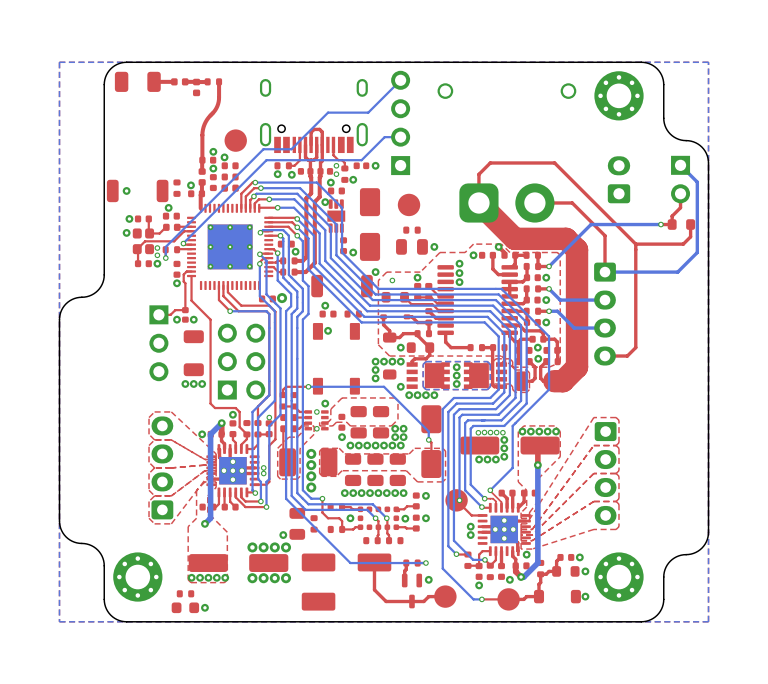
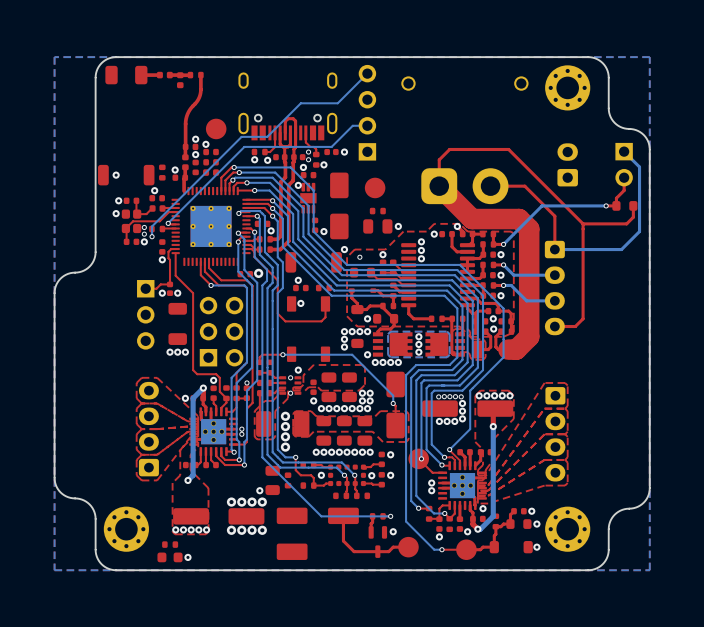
top track: none -> (246, 249) (251, 249) (254, 251) (254, 256) (277, 280) (277, 313) (285, 321) (321, 321) (325, 317) (325, 303)

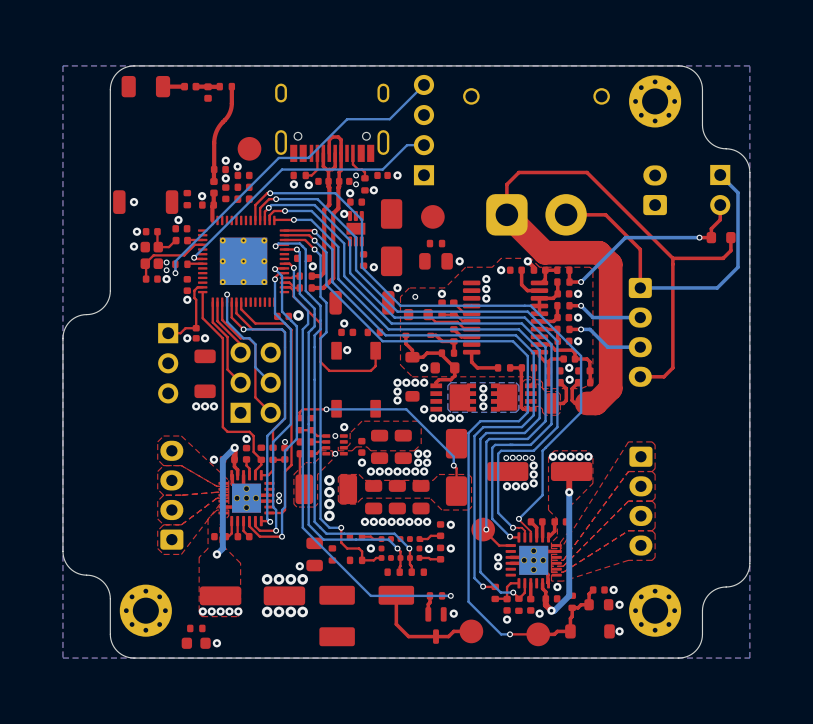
bottom track: none -> (227, 294) (227, 321) (243, 338) (249, 338) (255, 344) (255, 367) (270, 382)
via: none -> (227, 294)
top track: none -> (212, 302) (212, 322) (227, 337) (227, 369) (240, 382)
top track: none -> (217, 302) (217, 321) (240, 344) (240, 352)
top track: none -> (222, 302) (222, 319) (240, 338) (248, 338) (255, 344) (255, 397) (270, 412)

